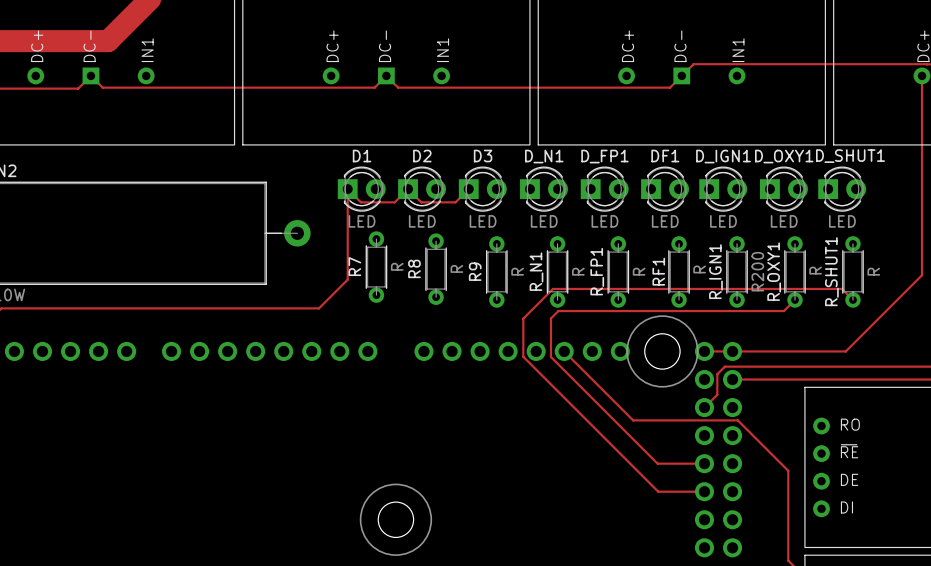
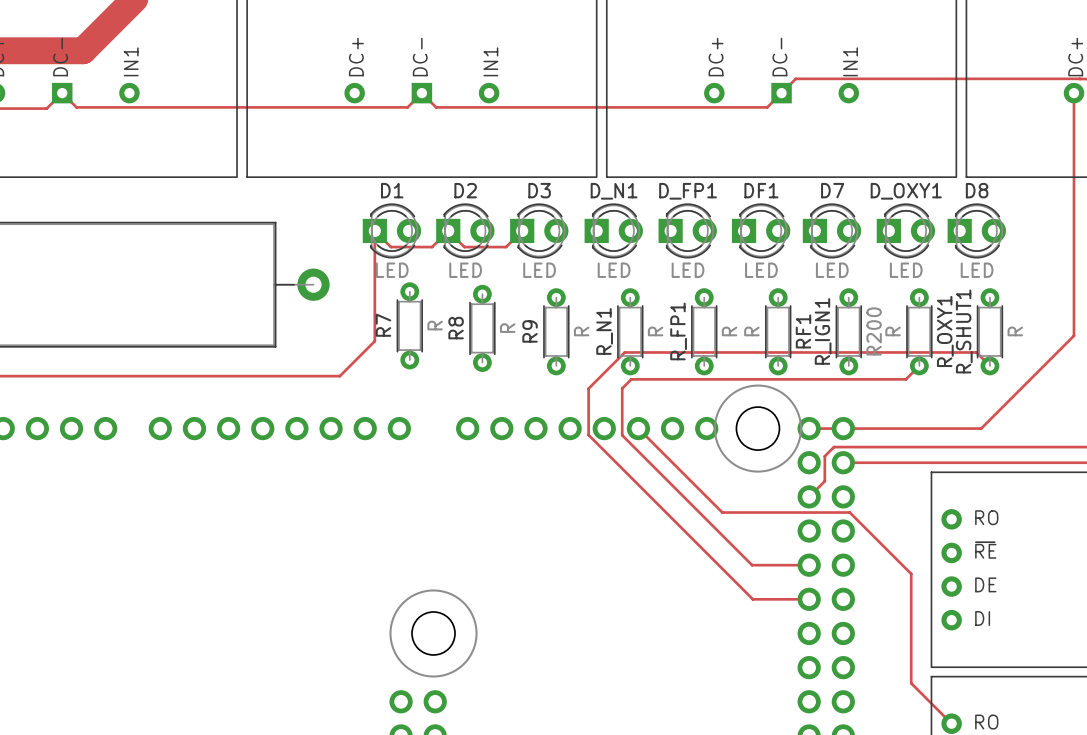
D_IGN1 name: D_IGN1 (723, 156) -> D7 (832, 190)
D_SHUT1 name: D_SHUT1 (850, 156) -> D8 (977, 190)
RF1 value position: R (699, 269) -> R (751, 331)
R_OXY1 value position: R (815, 270) -> R (893, 331)
RF1 name position: RF1 (658, 271) -> RF1 (803, 331)
R_OXY1 name position: R_OXY1 (774, 271) -> R_OXY1 (945, 331)

